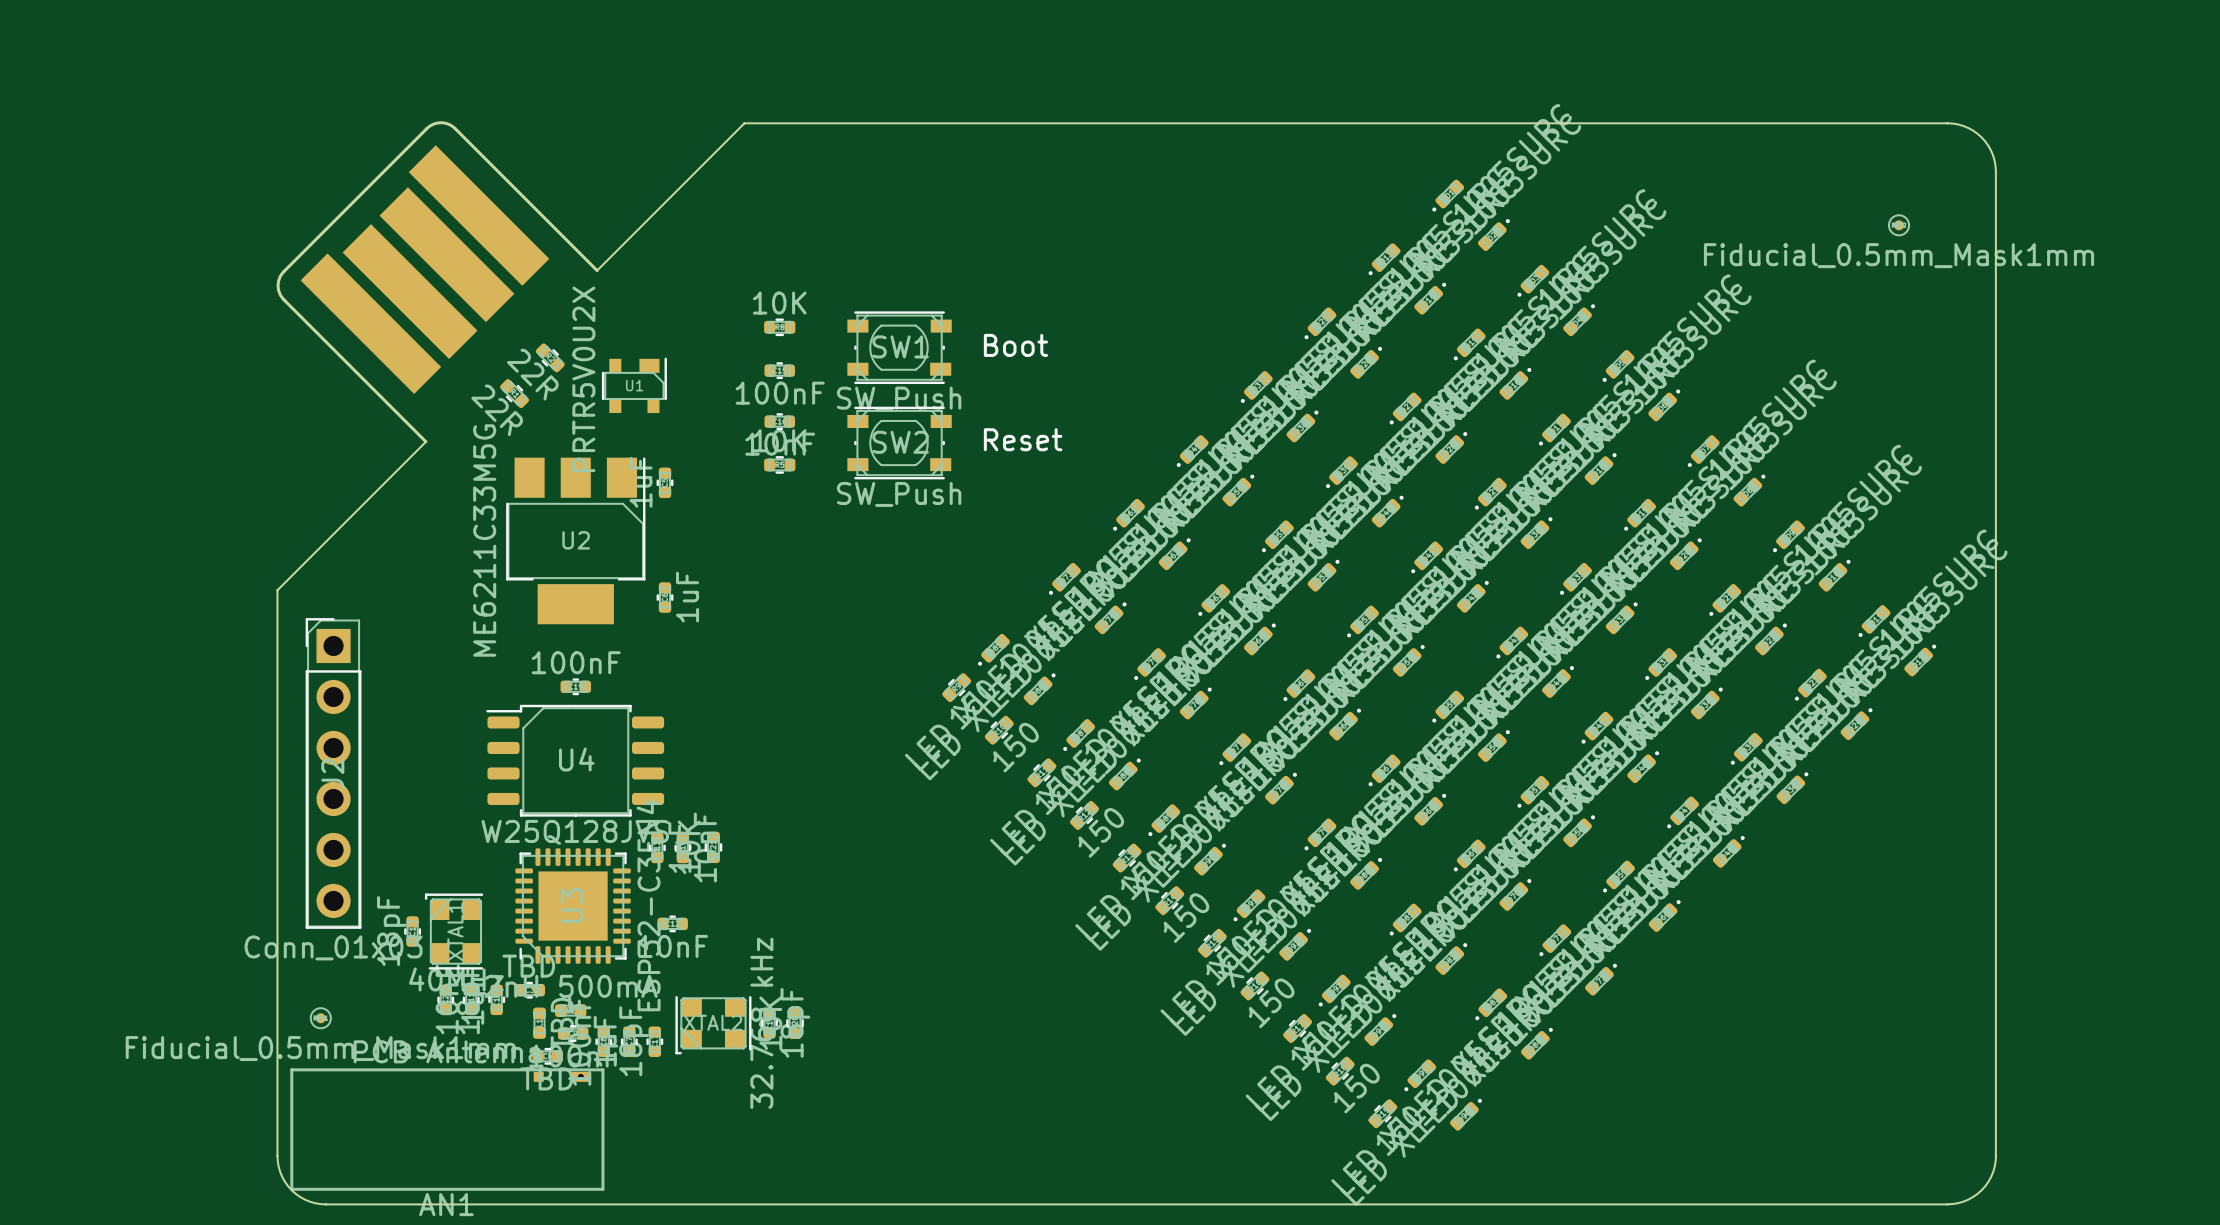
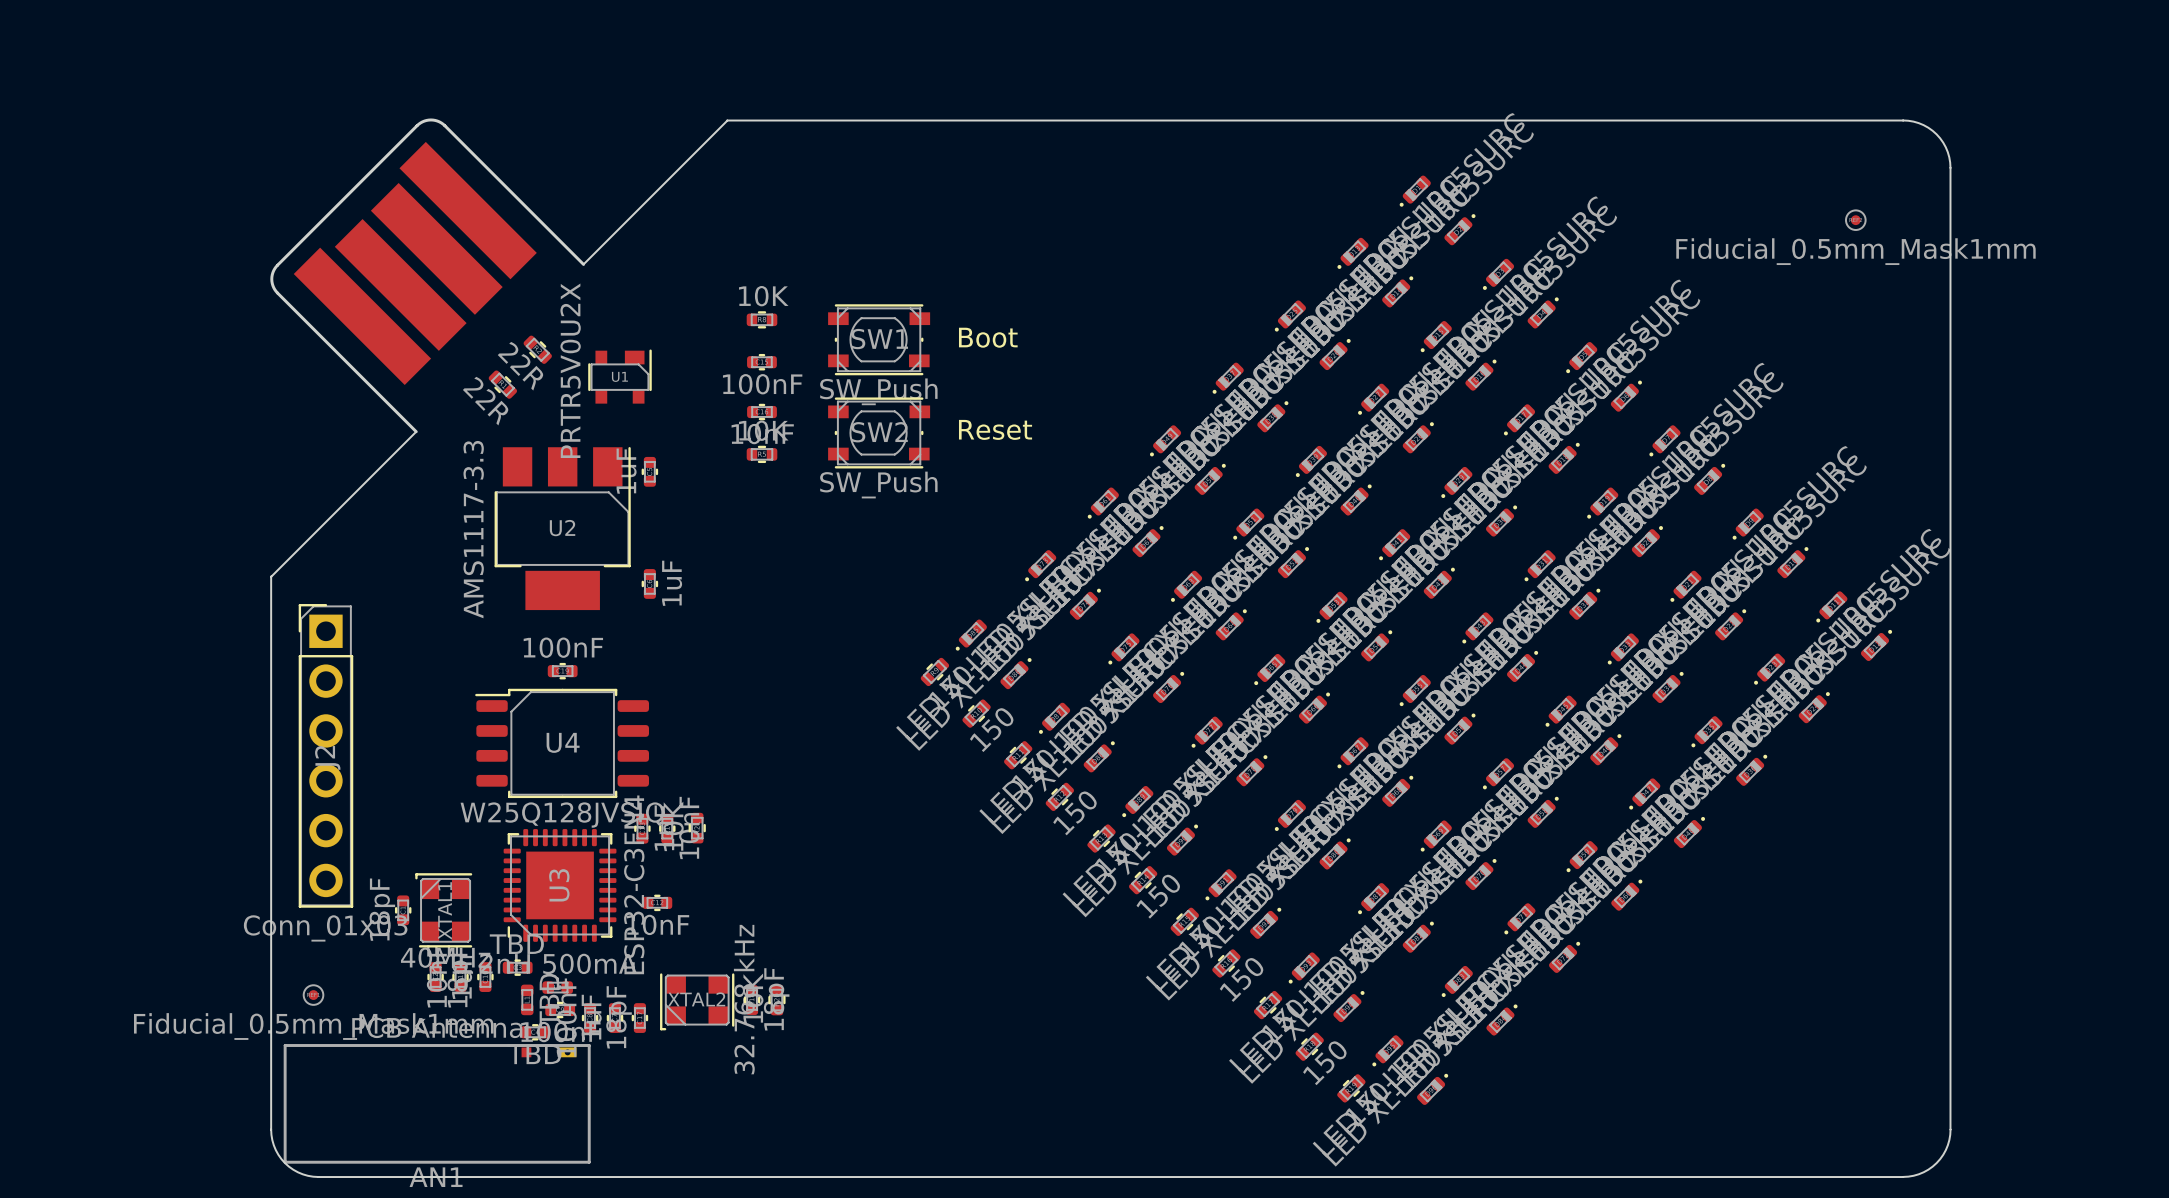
U2 value: ME6211C33M5G (484, 540) -> AMS1117-3.3 (473, 529)
U4 value: W25Q128JVS (575, 832) -> W25Q128JVSIQ (562, 815)

